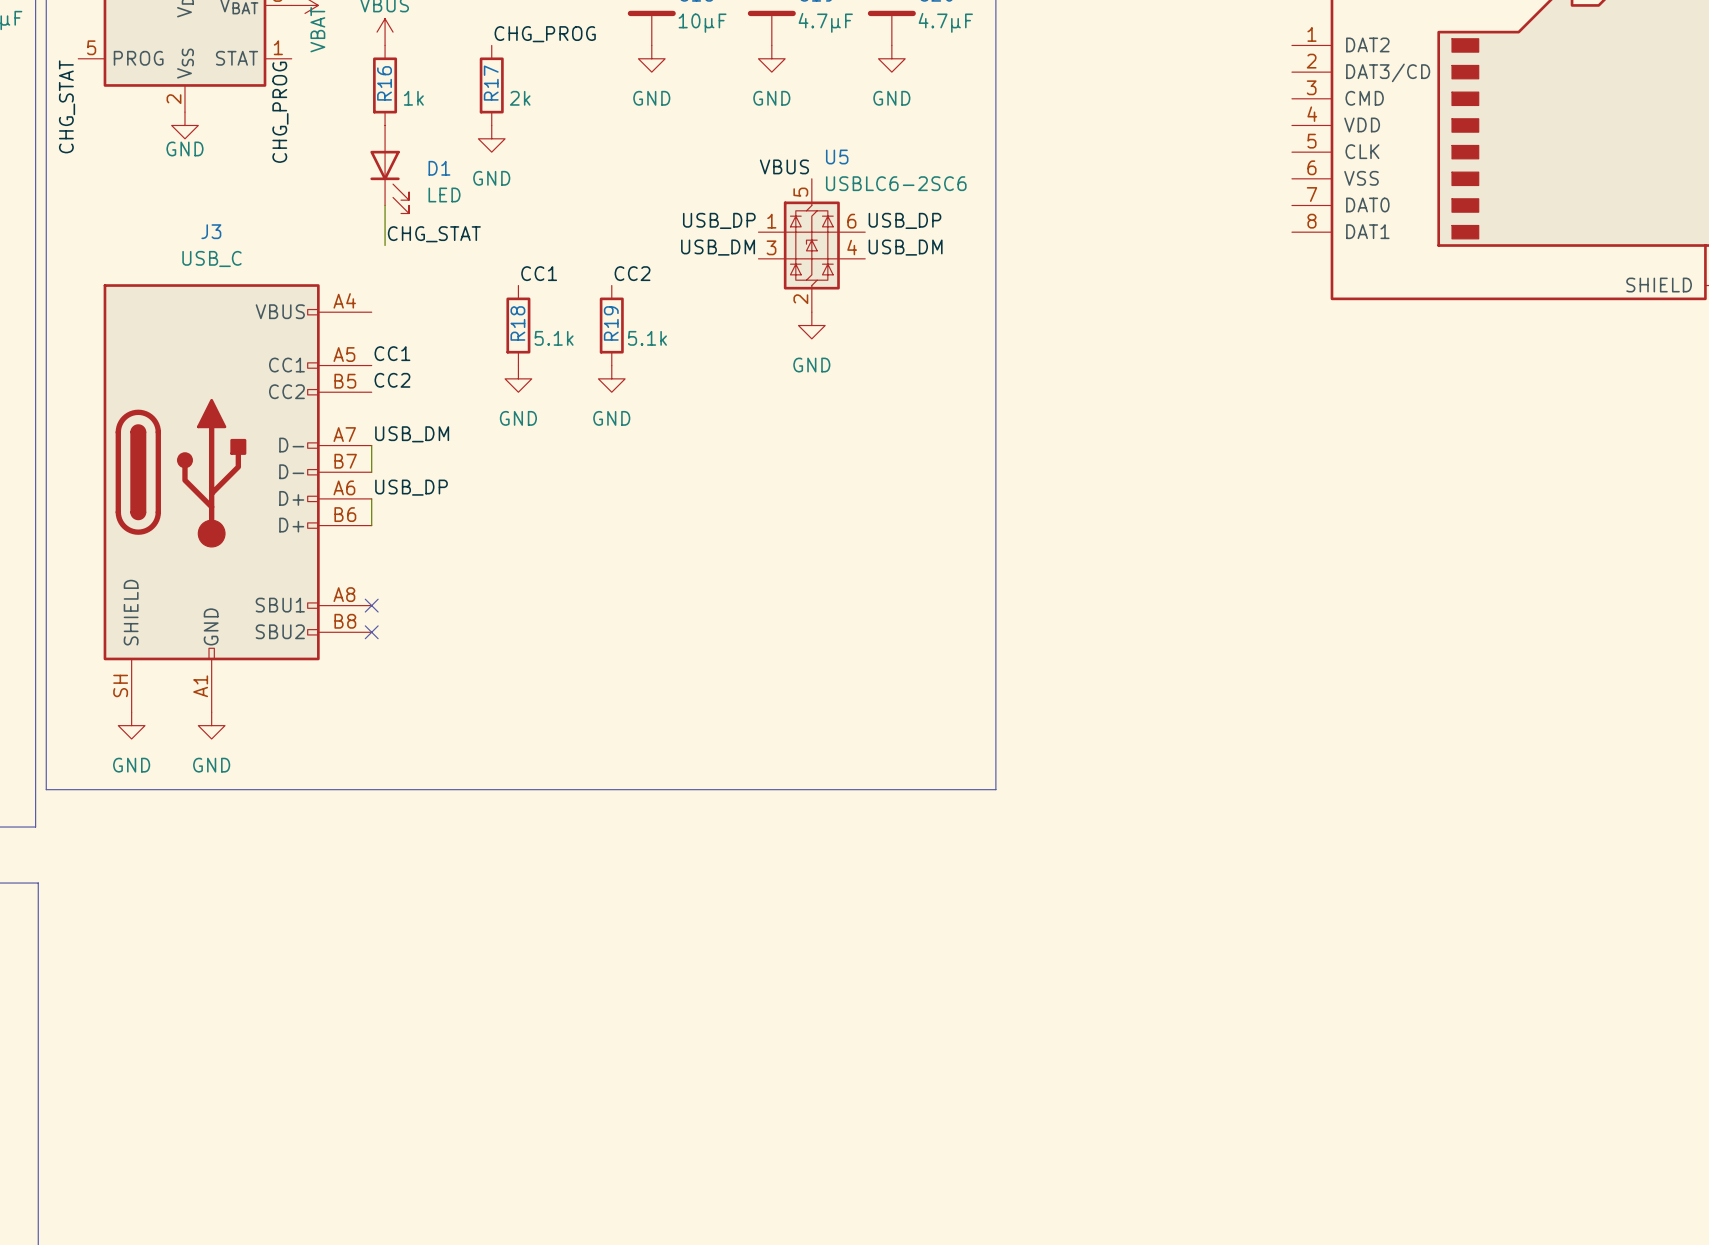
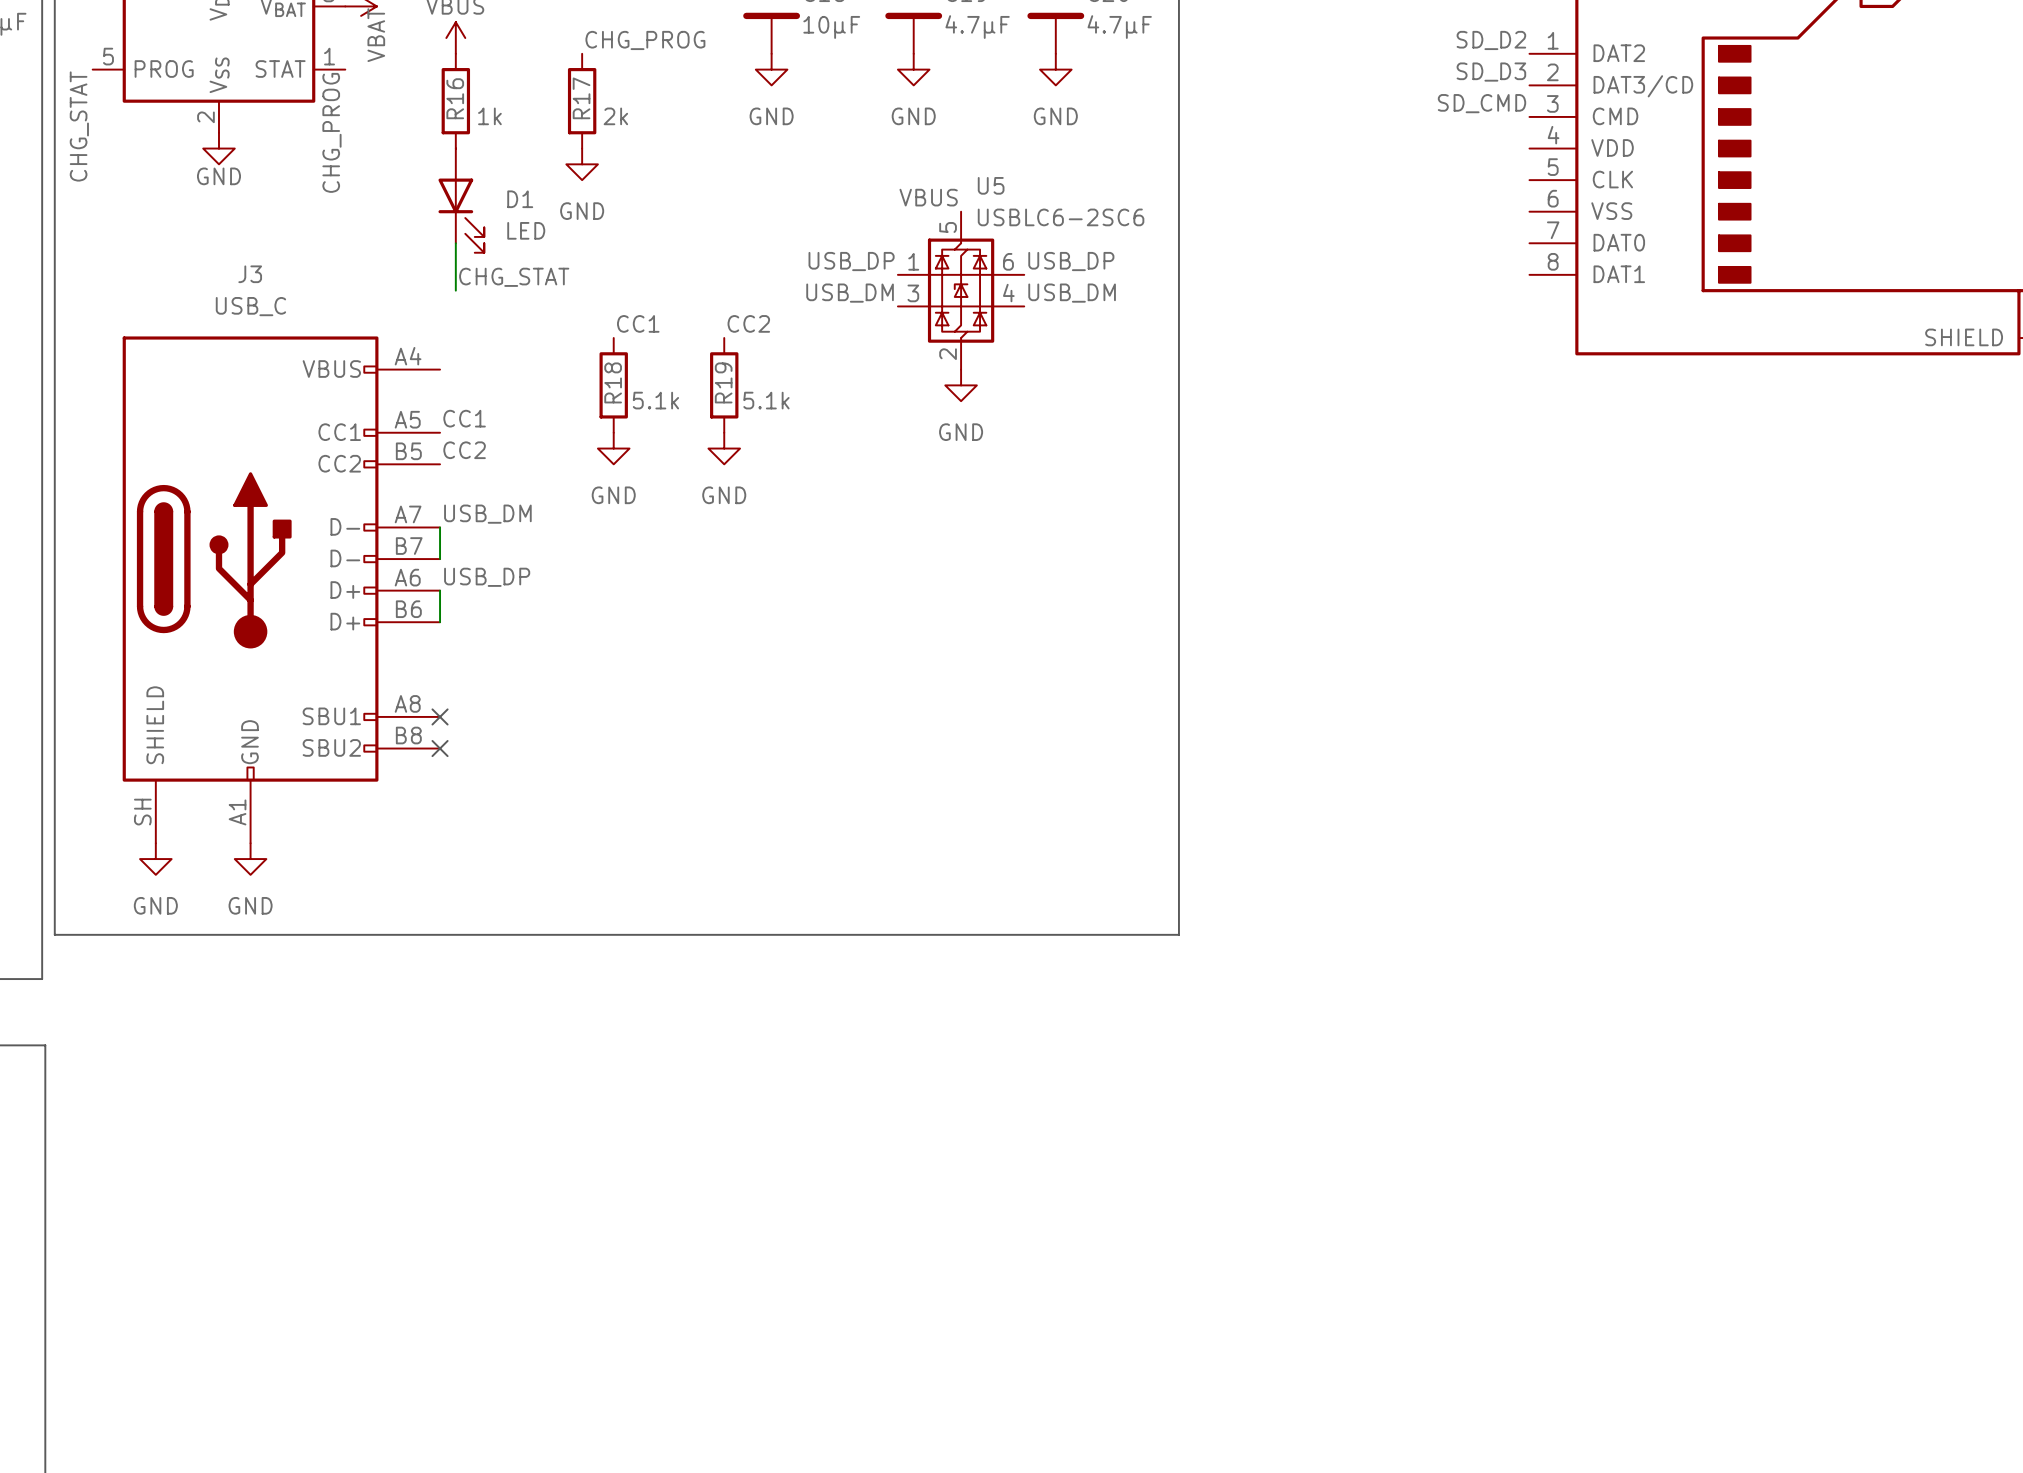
label: none -> SD_D2 (1491, 40)
label: none -> SD_D3 (1491, 72)
label: none -> SD_CMD (1482, 103)

